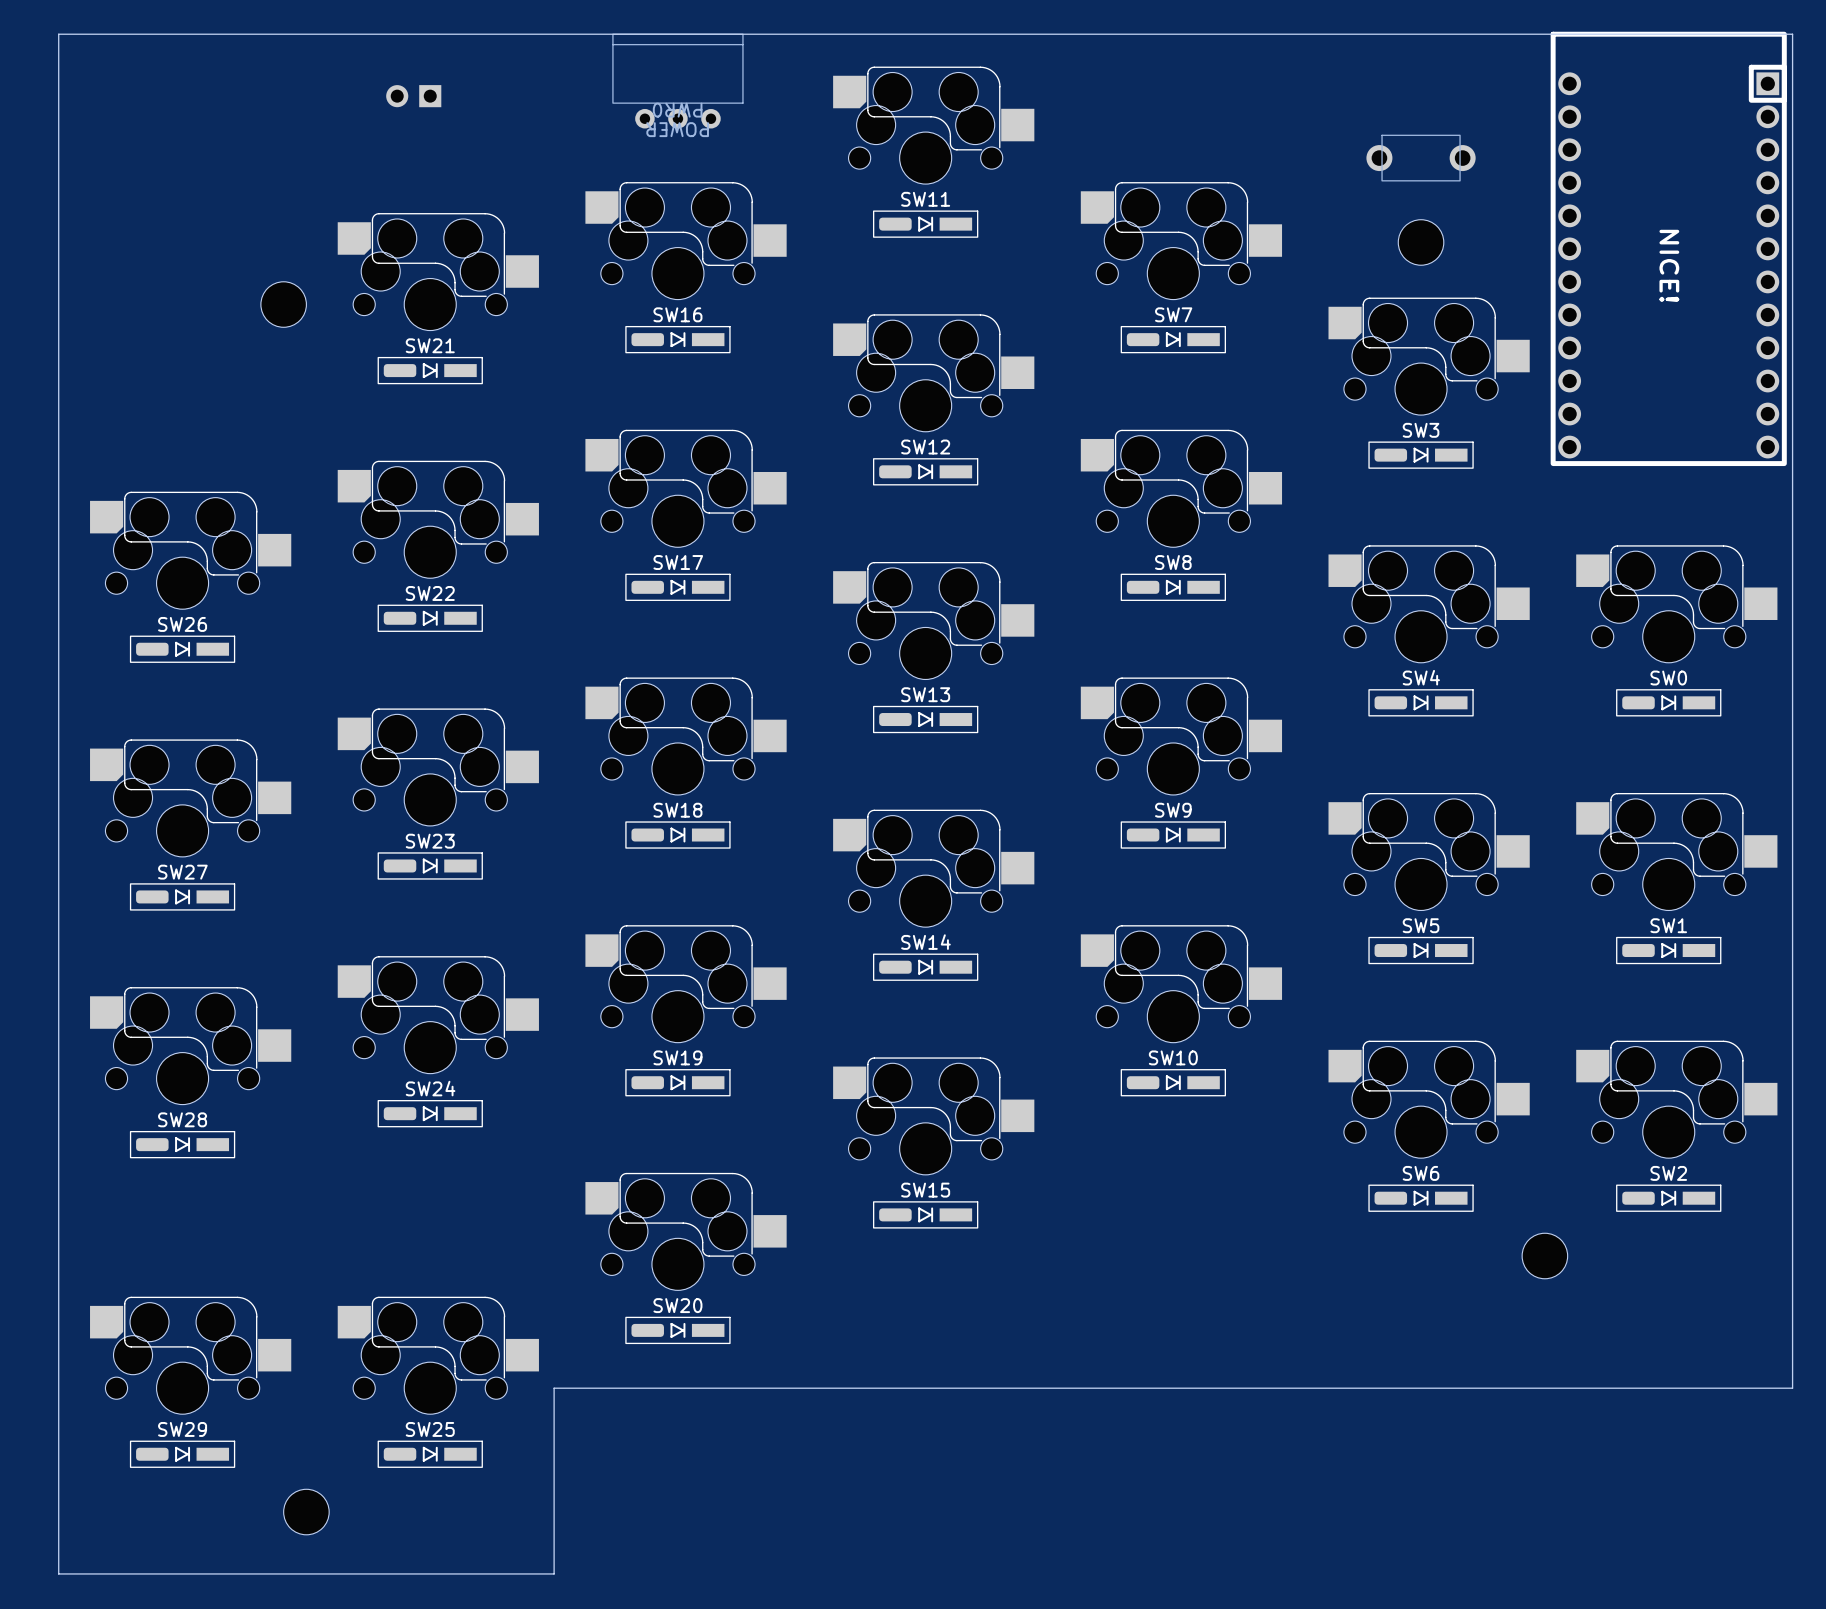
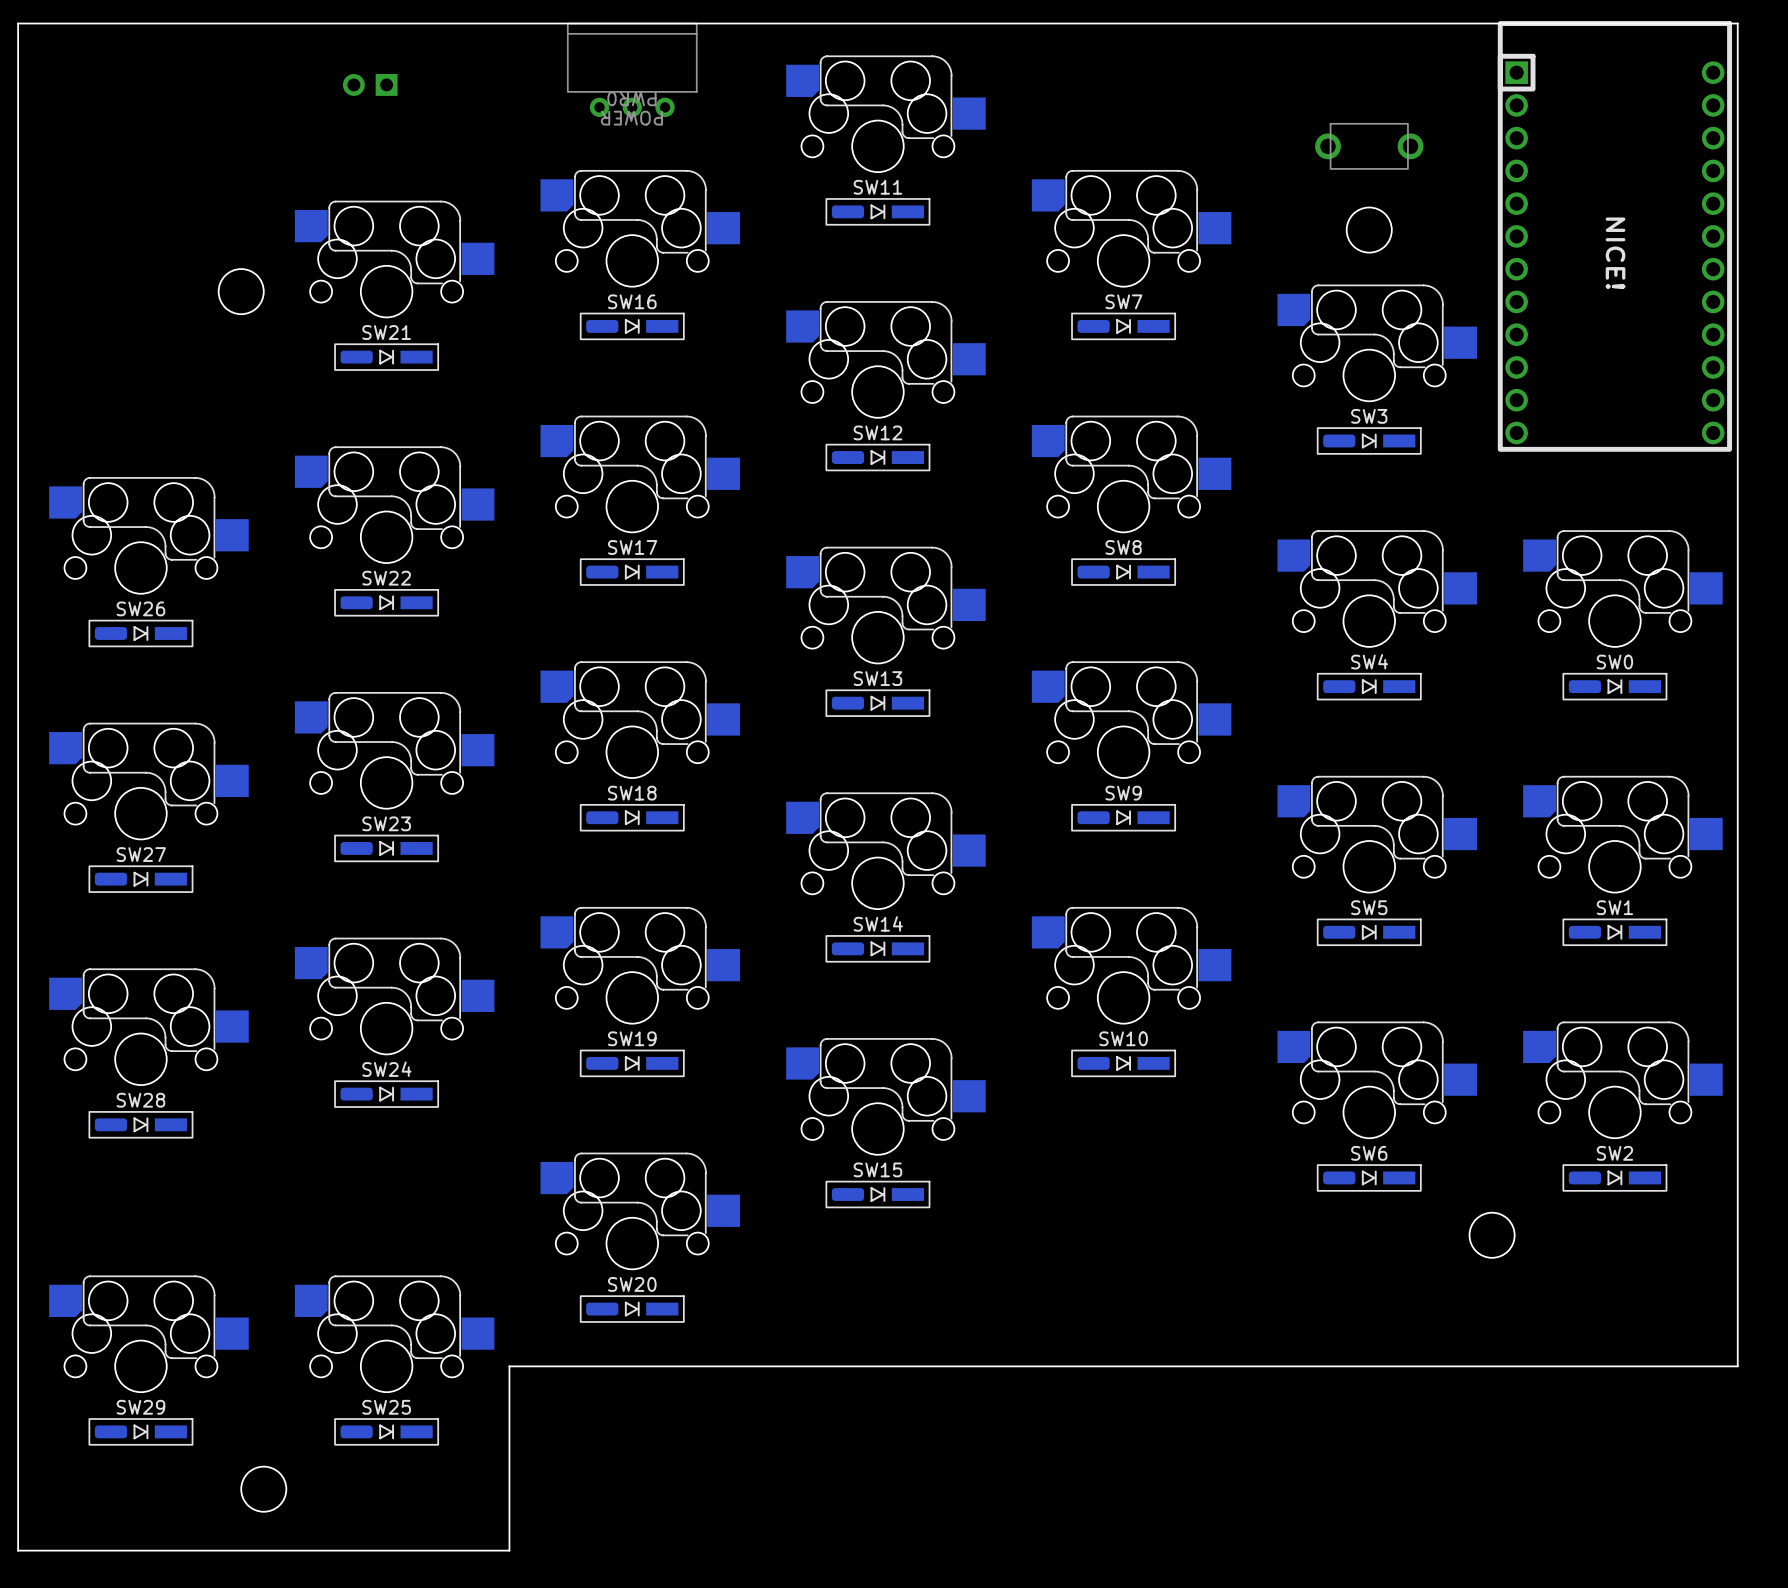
part side: top (1668, 248) -> bottom (1614, 236)

